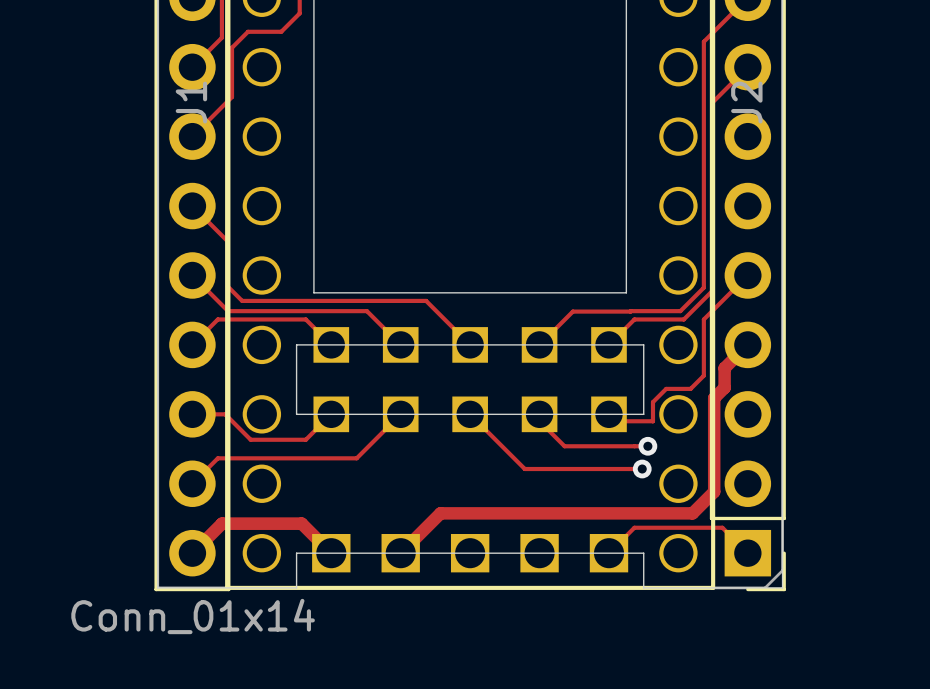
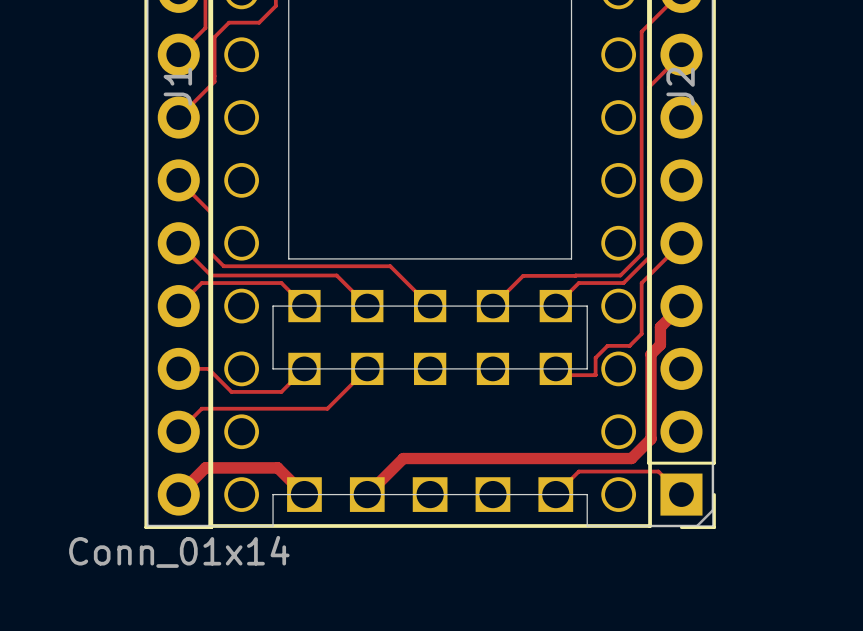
track: (477, 421) (524, 469) (642, 469) -> none
track: (539, 421) (564, 446) (647, 446) -> none
via: (647, 446) -> none
via: (642, 469) -> none

